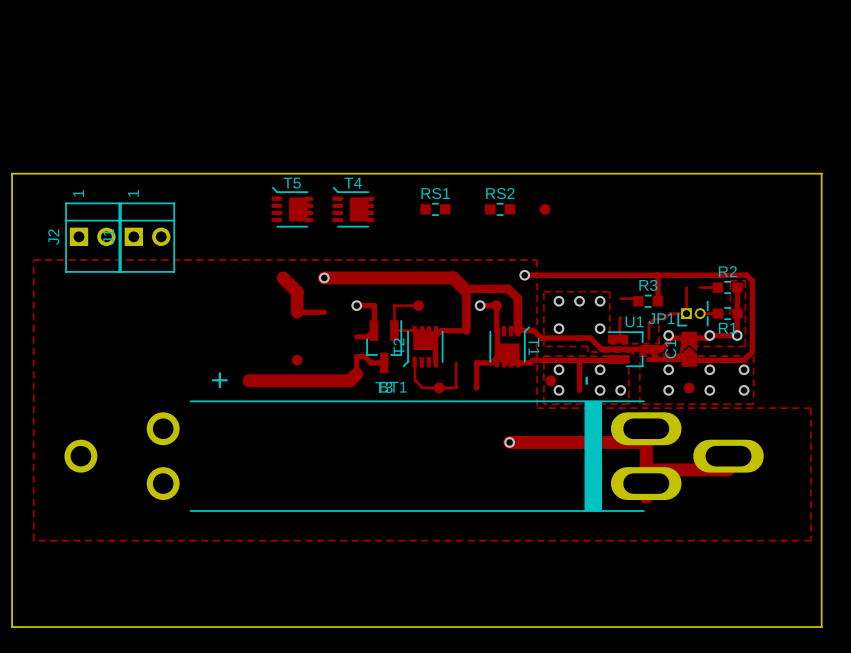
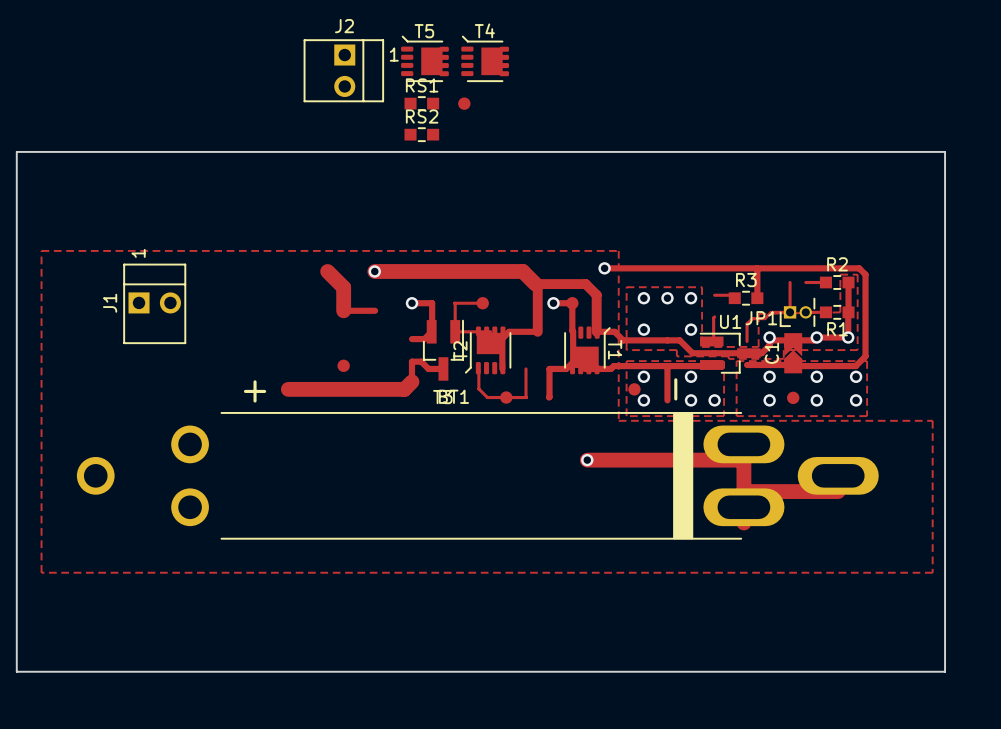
T5 position: (292, 207) -> (424, 58)
T4 position: (353, 207) -> (485, 58)
RS1 position: (435, 209) -> (421, 103)
RS2 position: (500, 209) -> (421, 134)
part position: (545, 209) -> (464, 103)
J2 rotation: 0° (92, 237) -> 90° clockwise (343, 70)
J2 position: (92, 237) -> (343, 70)
J1 position: (147, 237) -> (154, 303)

